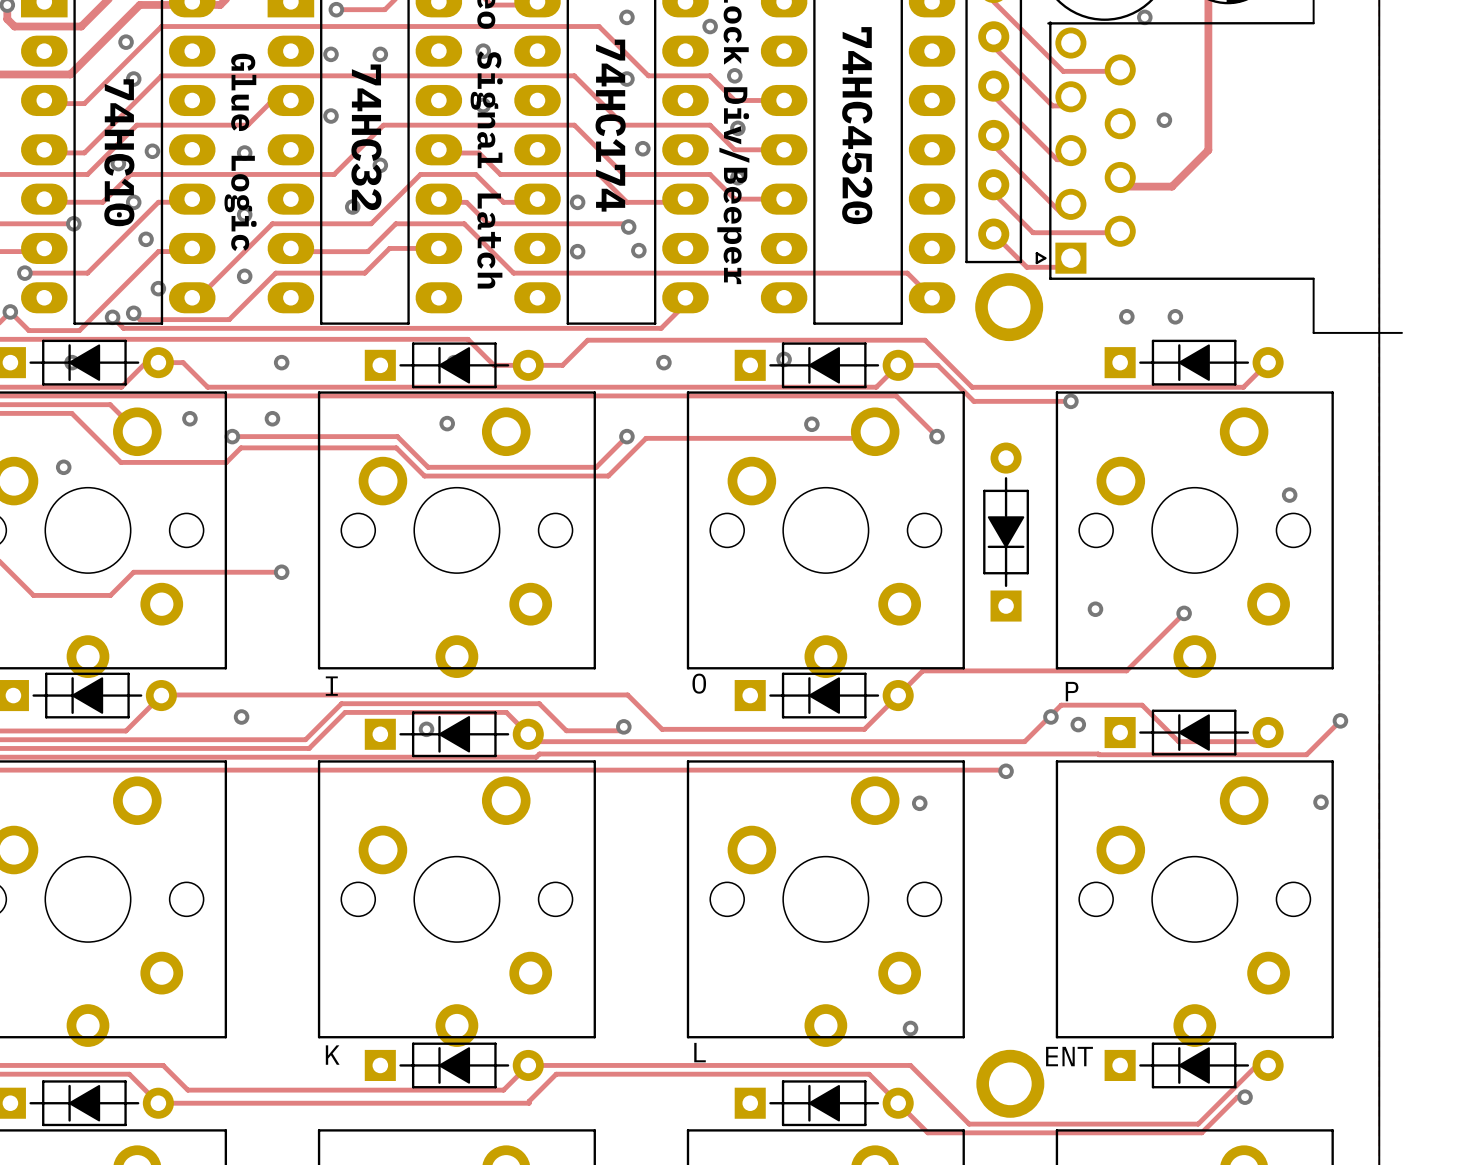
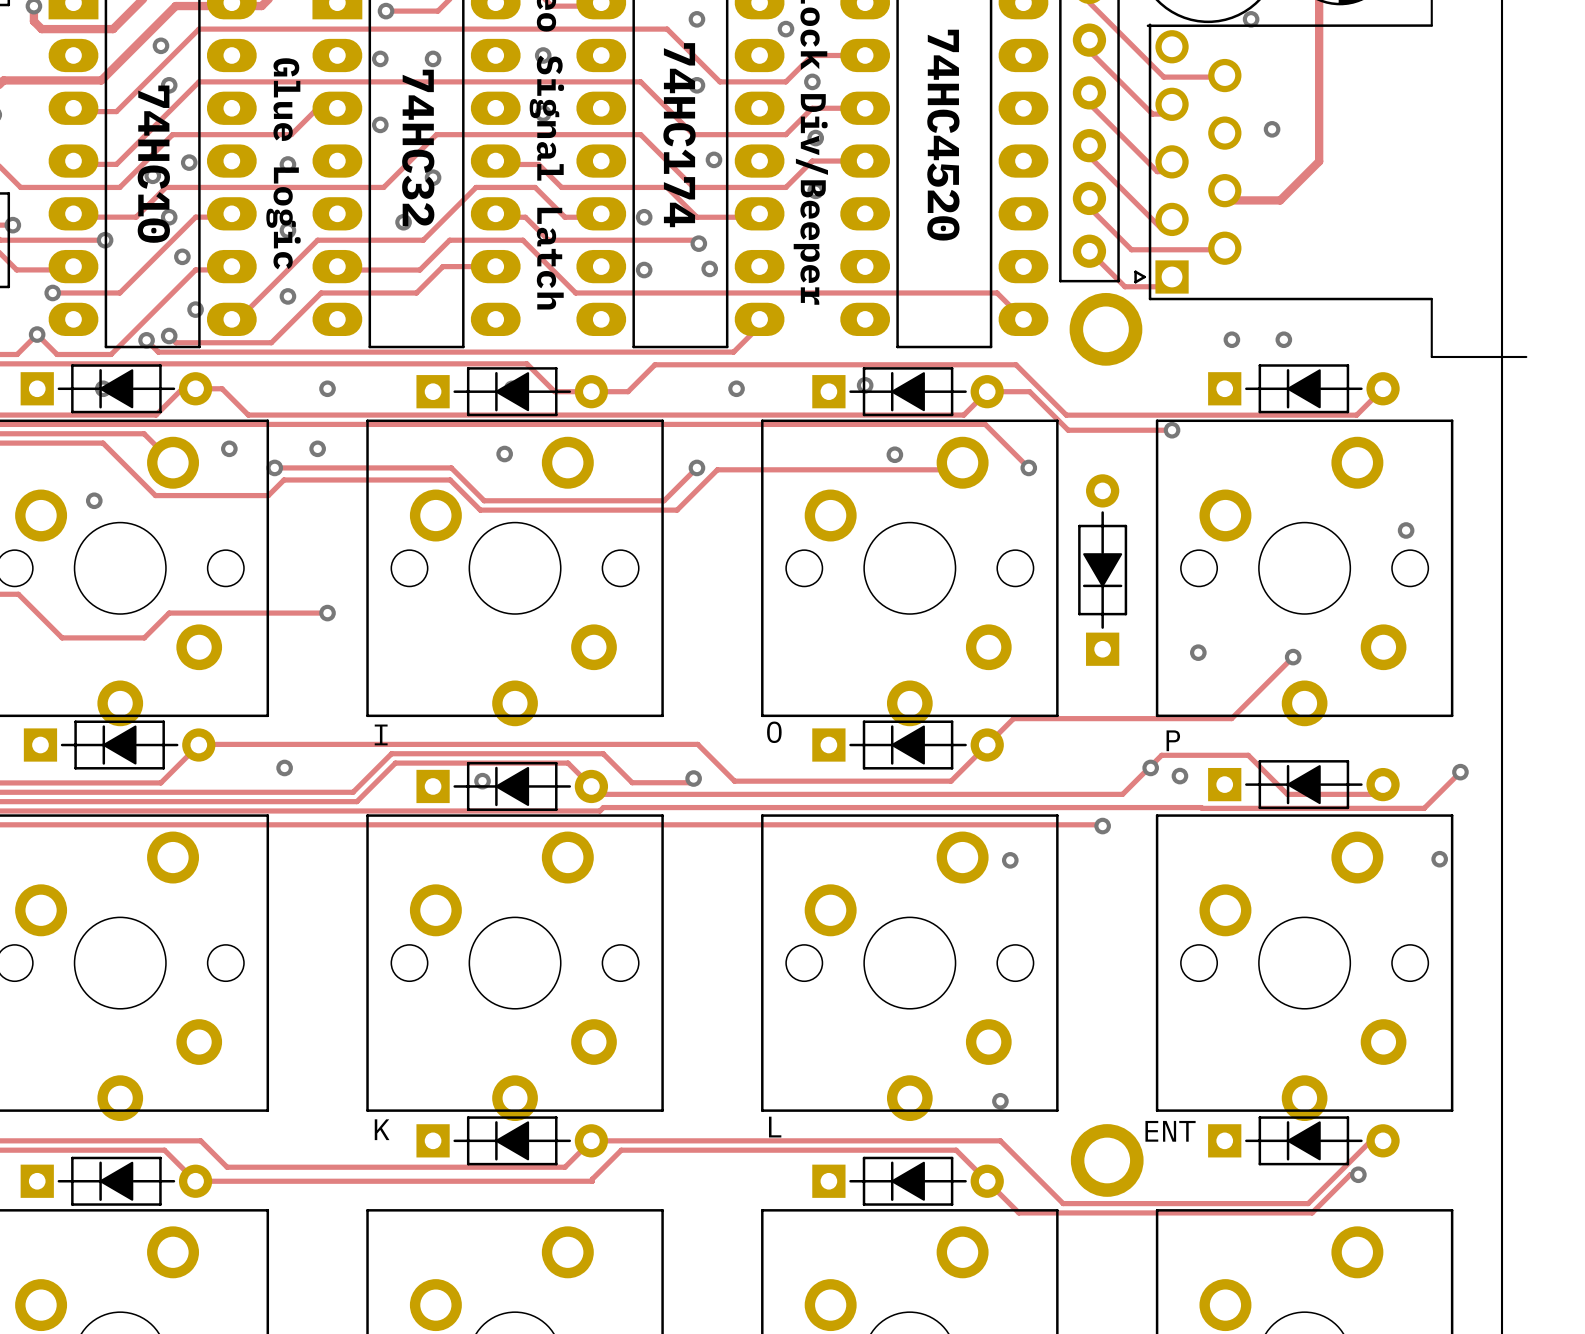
track: none -> (865, 55) (812, 55) (785, 81)
track: (710, 75) (734, 100) -> (785, 134) (812, 108)
track: (710, 125) (734, 149) -> (785, 187) (812, 161)
track: (710, 174) (734, 199) (784, 199) -> none

